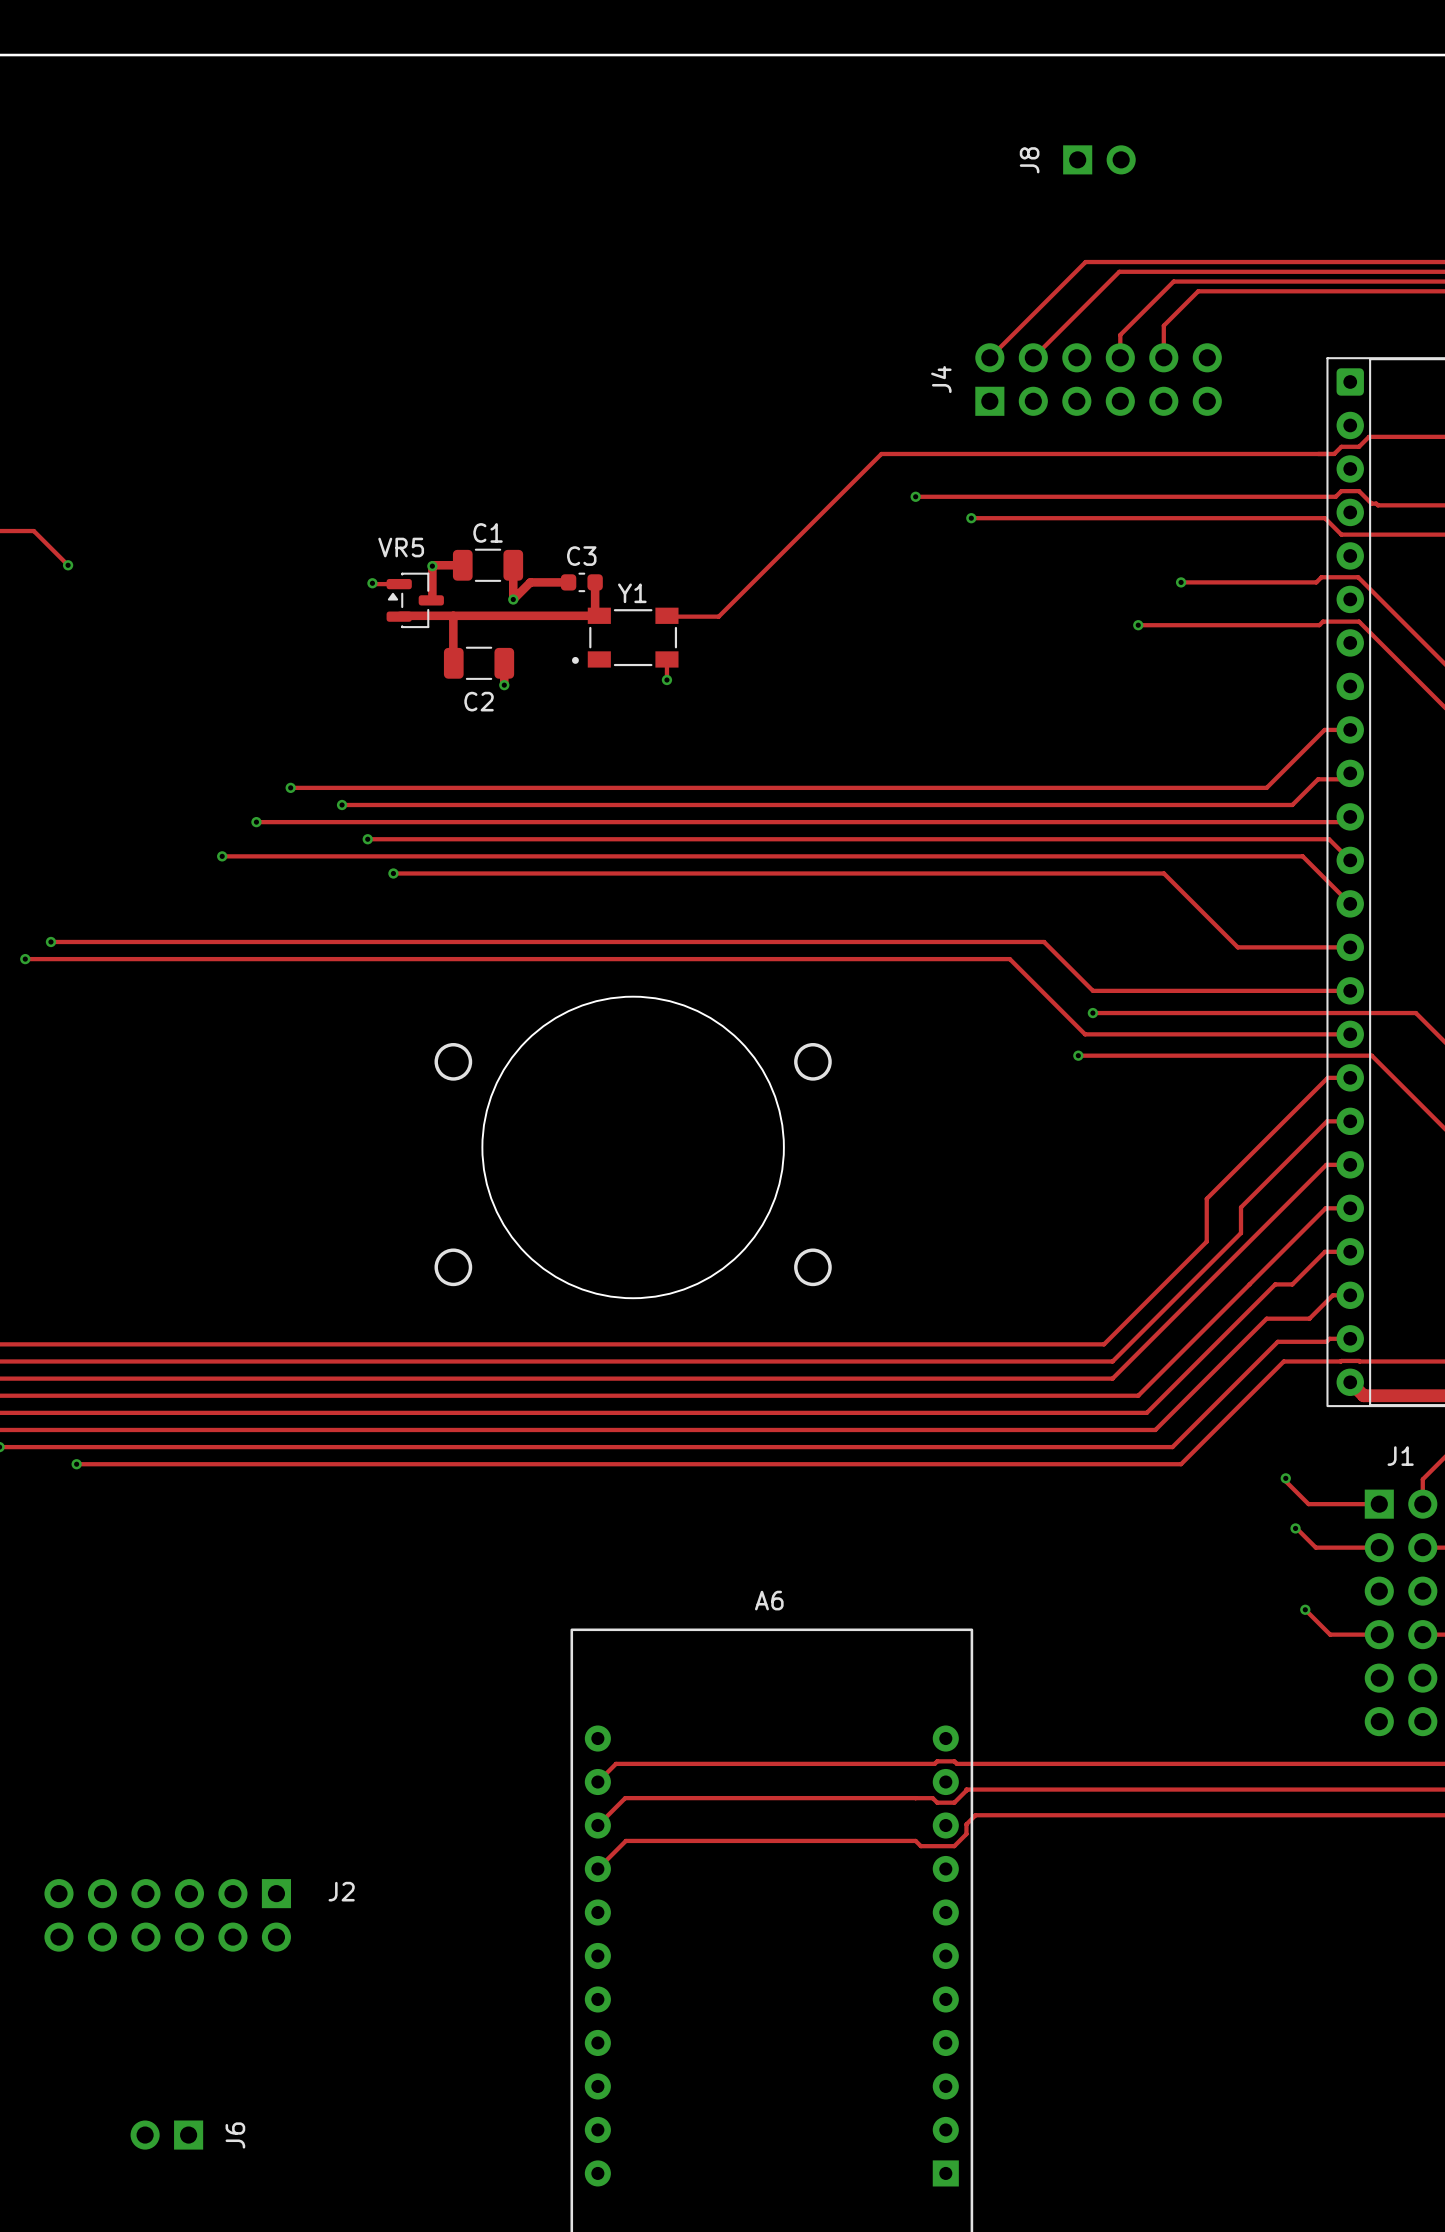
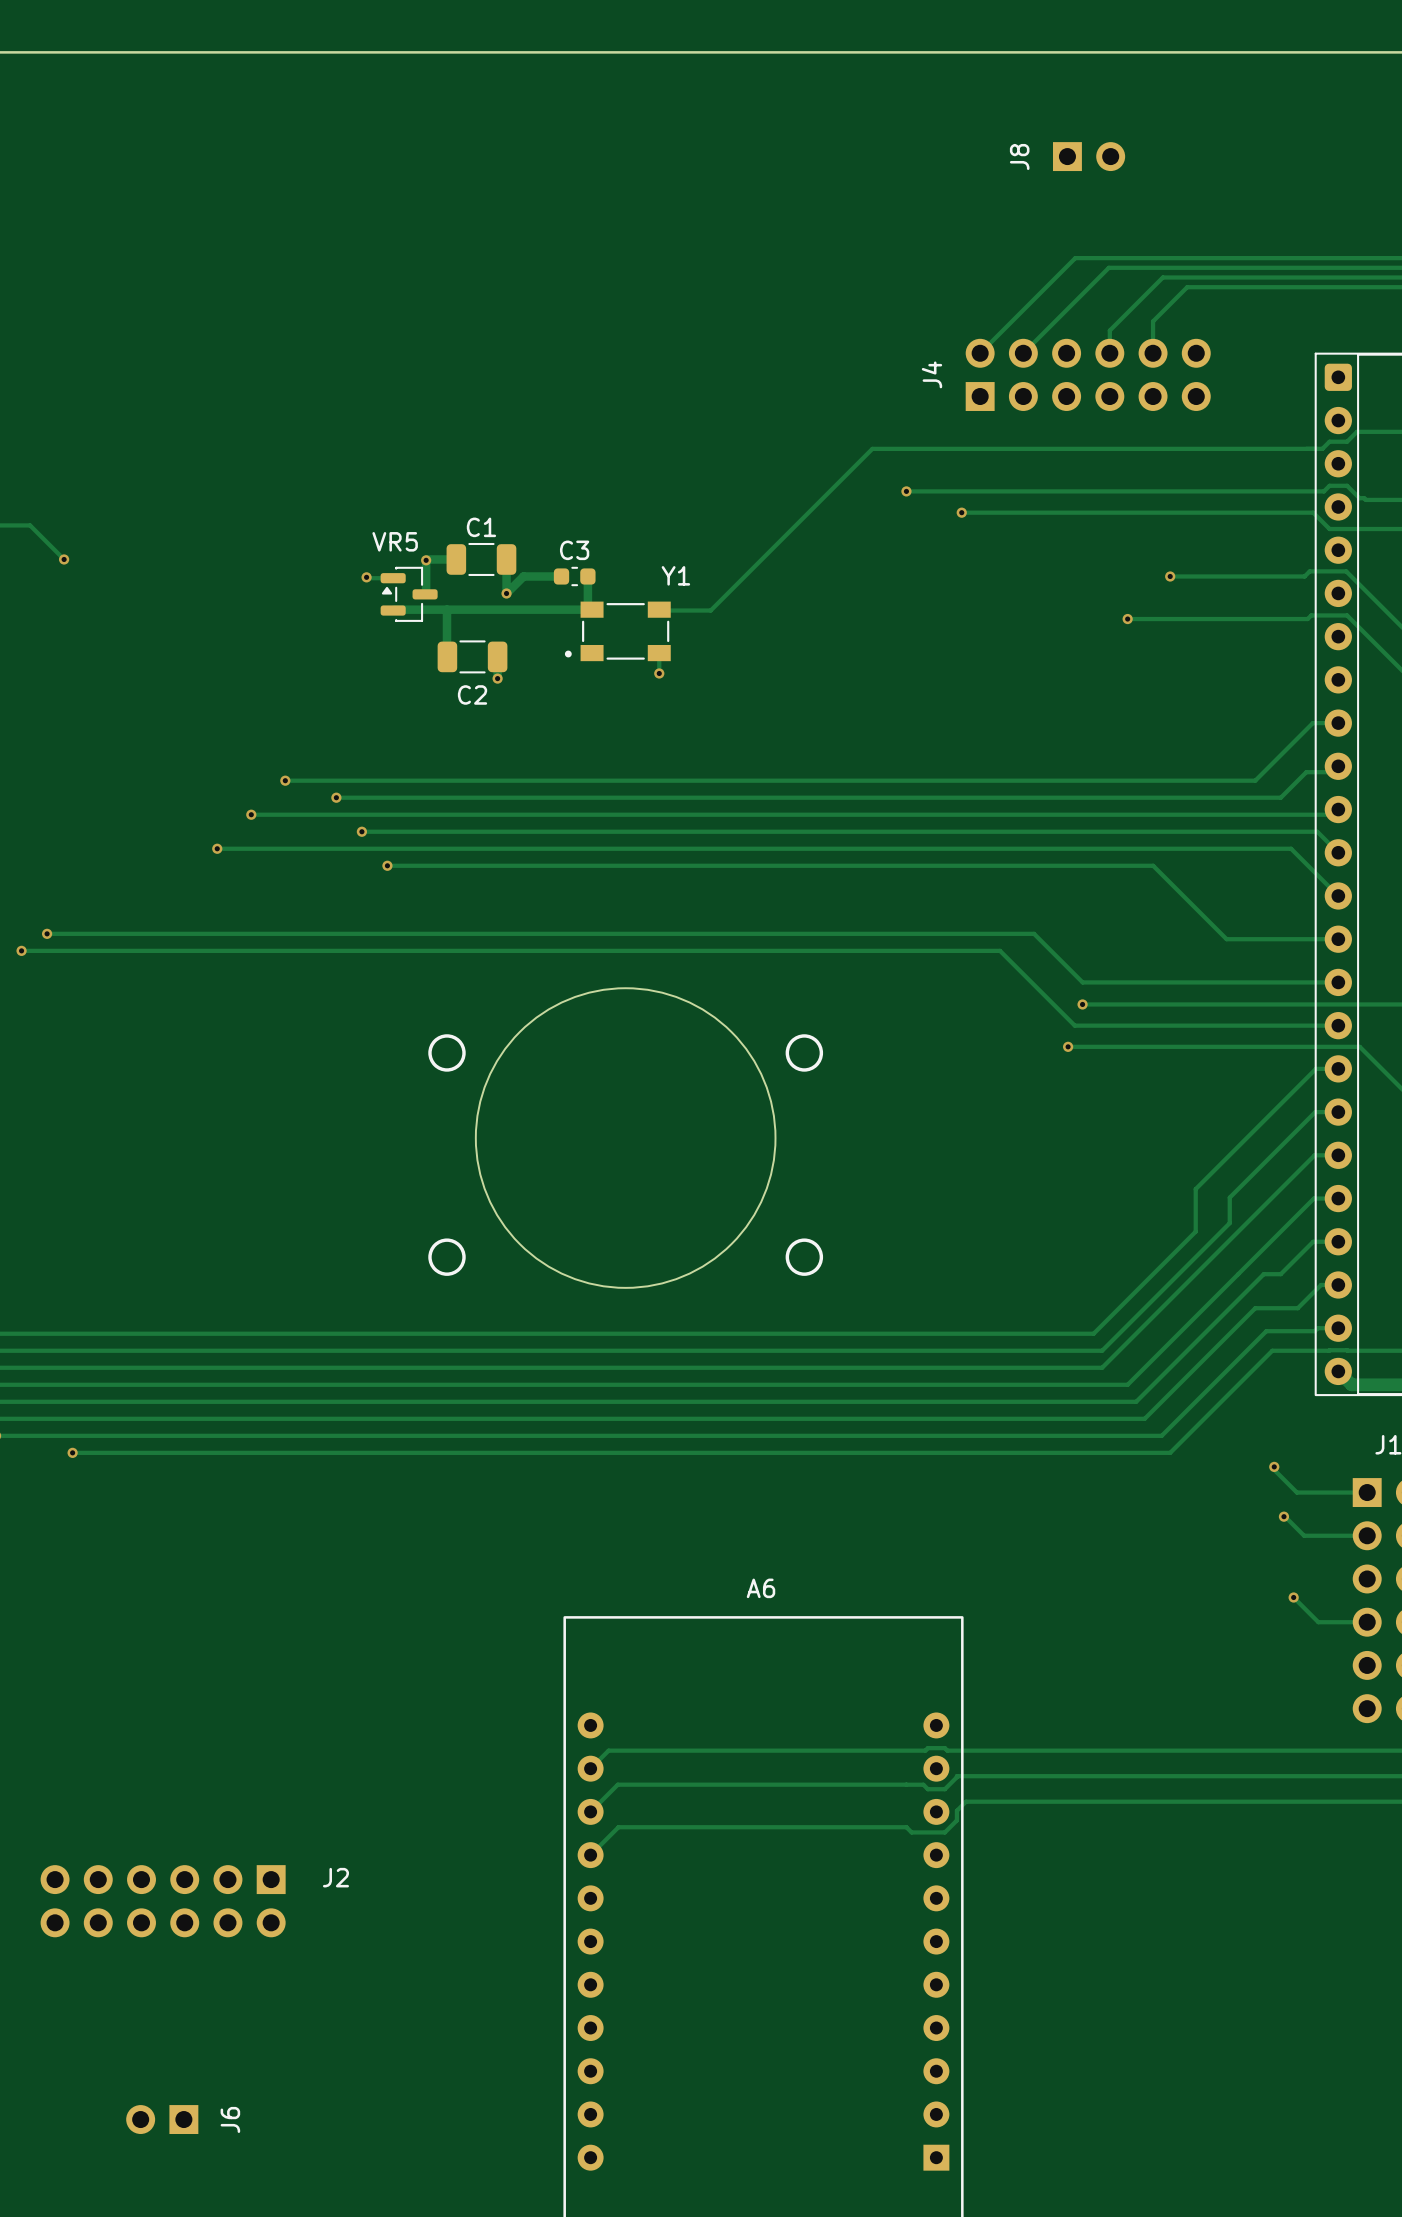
Y1 name position: Y1 (632, 593) -> Y1 (675, 575)

